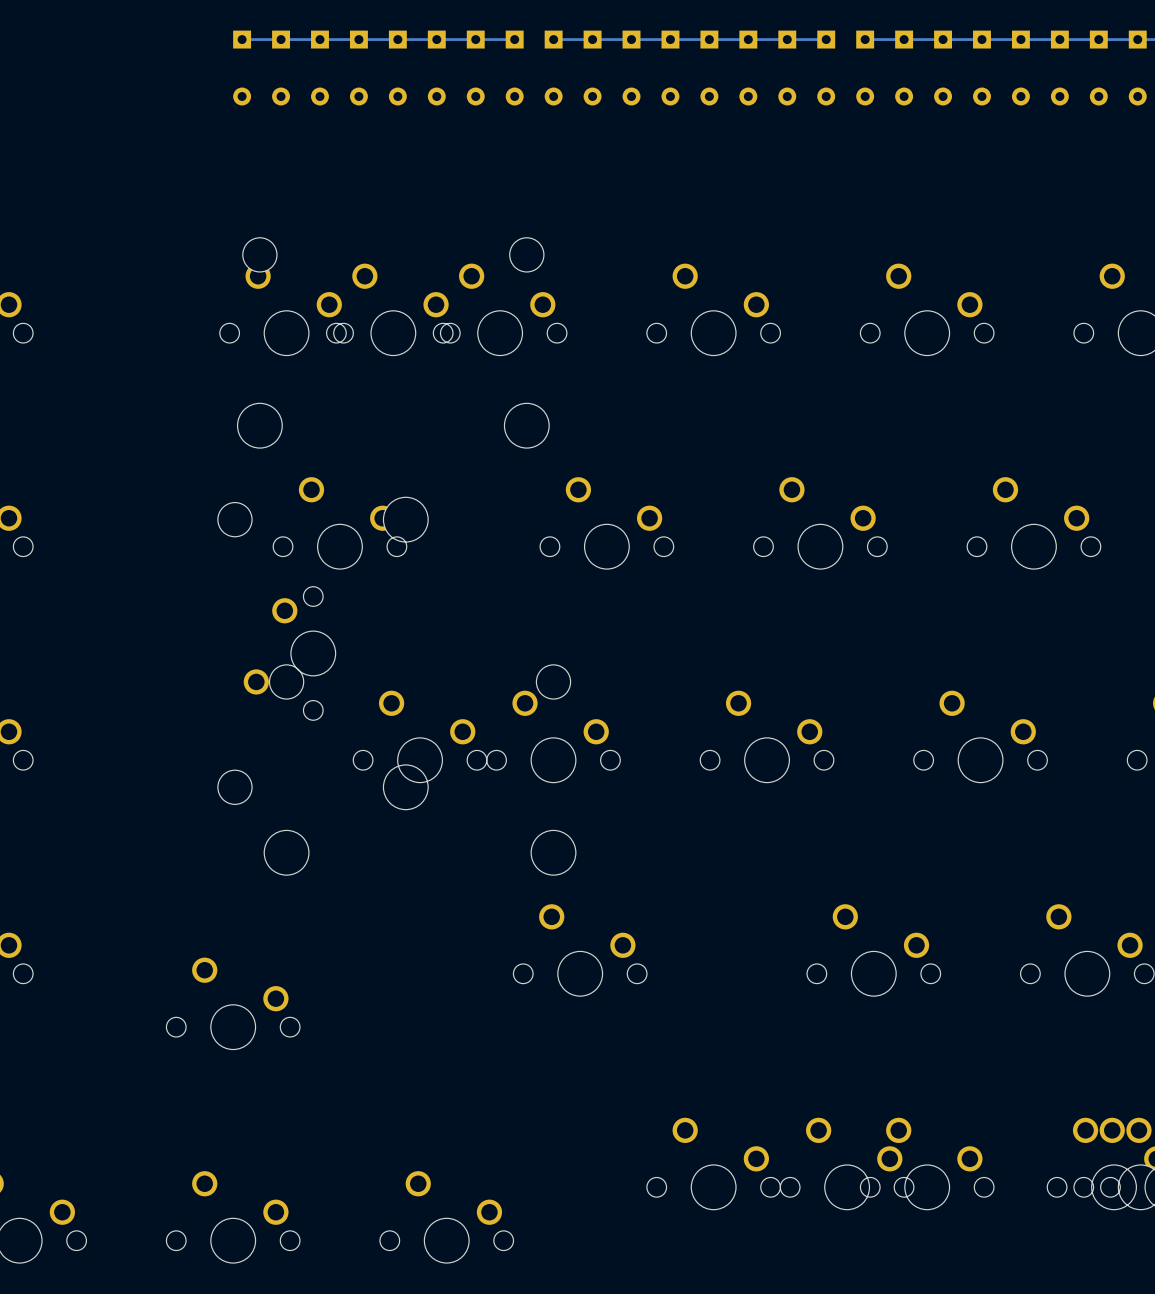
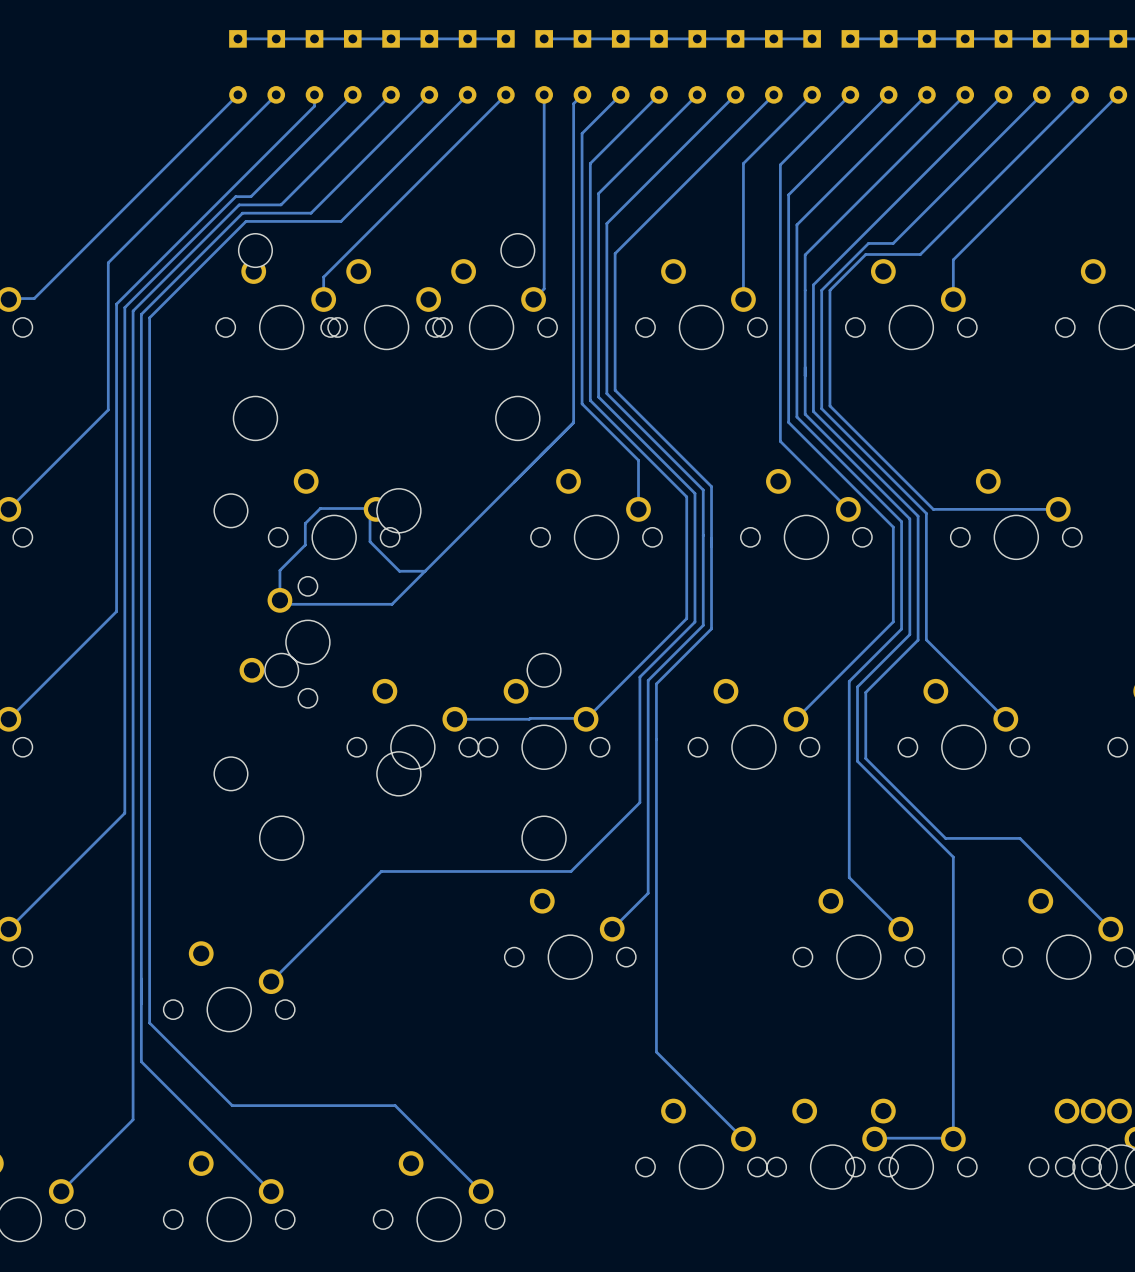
track: none -> (237, 94) (34, 298) (8, 299)
track: none -> (276, 94) (108, 262) (108, 409) (8, 509)
track: none -> (314, 94) (314, 106) (116, 304) (116, 611) (8, 719)
track: none -> (352, 94) (251, 196) (235, 196) (124, 307) (124, 813) (8, 929)
track: none -> (391, 94) (281, 204) (239, 204) (133, 311) (133, 1119) (61, 1191)
track: none -> (429, 94) (311, 213) (242, 213) (141, 314) (141, 1061) (271, 1191)
track: none -> (467, 94) (341, 221) (246, 221) (149, 317) (149, 1022) (232, 1105) (395, 1105) (481, 1191)
track: none -> (505, 94) (323, 277) (323, 299)
track: none -> (544, 94) (544, 288) (533, 299)
track: none -> (582, 94) (573, 103) (573, 422) (392, 604) (283, 604) (279, 600) (279, 570) (305, 545) (305, 523) (320, 508) (370, 508)
track: none -> (620, 94) (582, 133) (582, 403) (638, 460) (638, 509)
track: none -> (659, 94) (590, 163) (590, 400) (686, 496) (686, 618) (586, 719) (454, 719)
track: none -> (697, 94) (598, 193) (598, 397) (694, 493) (694, 621) (639, 677) (639, 802) (571, 871) (381, 871) (271, 981)
track: none -> (735, 94) (606, 223) (606, 393) (703, 490) (703, 625) (648, 680) (648, 893) (612, 929)
track: none -> (773, 94) (615, 253) (615, 390) (711, 486) (711, 628) (656, 683) (656, 1052) (743, 1139)
track: none -> (812, 94) (743, 163) (743, 299)
track: none -> (850, 94) (780, 164) (780, 441) (848, 509)
track: none -> (888, 94) (788, 194) (788, 422) (893, 527) (893, 621) (795, 719)
track: none -> (926, 94) (796, 224) (796, 417) (901, 521) (901, 629) (849, 681) (849, 877) (900, 929)
track: none -> (965, 94) (805, 254) (805, 414) (909, 518) (909, 634) (857, 686) (857, 761) (953, 857) (953, 1139) (874, 1139)
track: none -> (1003, 94) (813, 284) (813, 411) (918, 516) (918, 640) (865, 692) (865, 758) (945, 838) (1020, 838) (1110, 929)
track: none -> (1041, 94) (893, 243) (868, 243) (821, 290) (821, 408) (926, 513) (926, 639) (1005, 719)
track: none -> (1080, 94) (920, 254) (865, 254) (829, 290) (829, 405) (933, 509) (1058, 509)
track: none -> (1118, 94) (953, 259) (953, 299)
track: none -> (370, 509) (370, 541) (399, 571) (425, 571)

